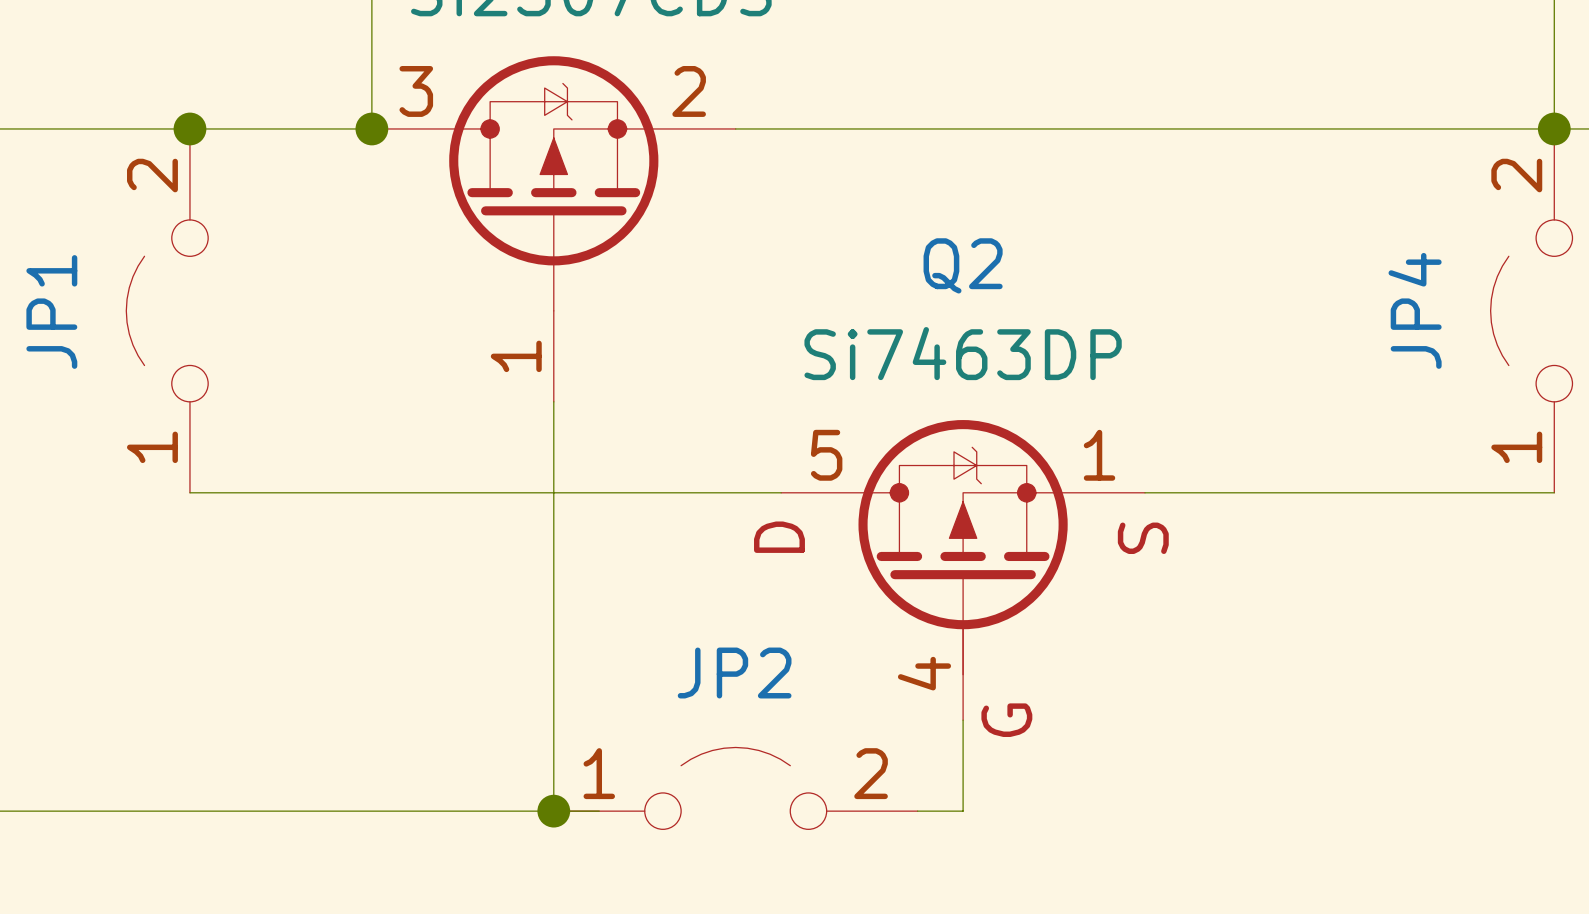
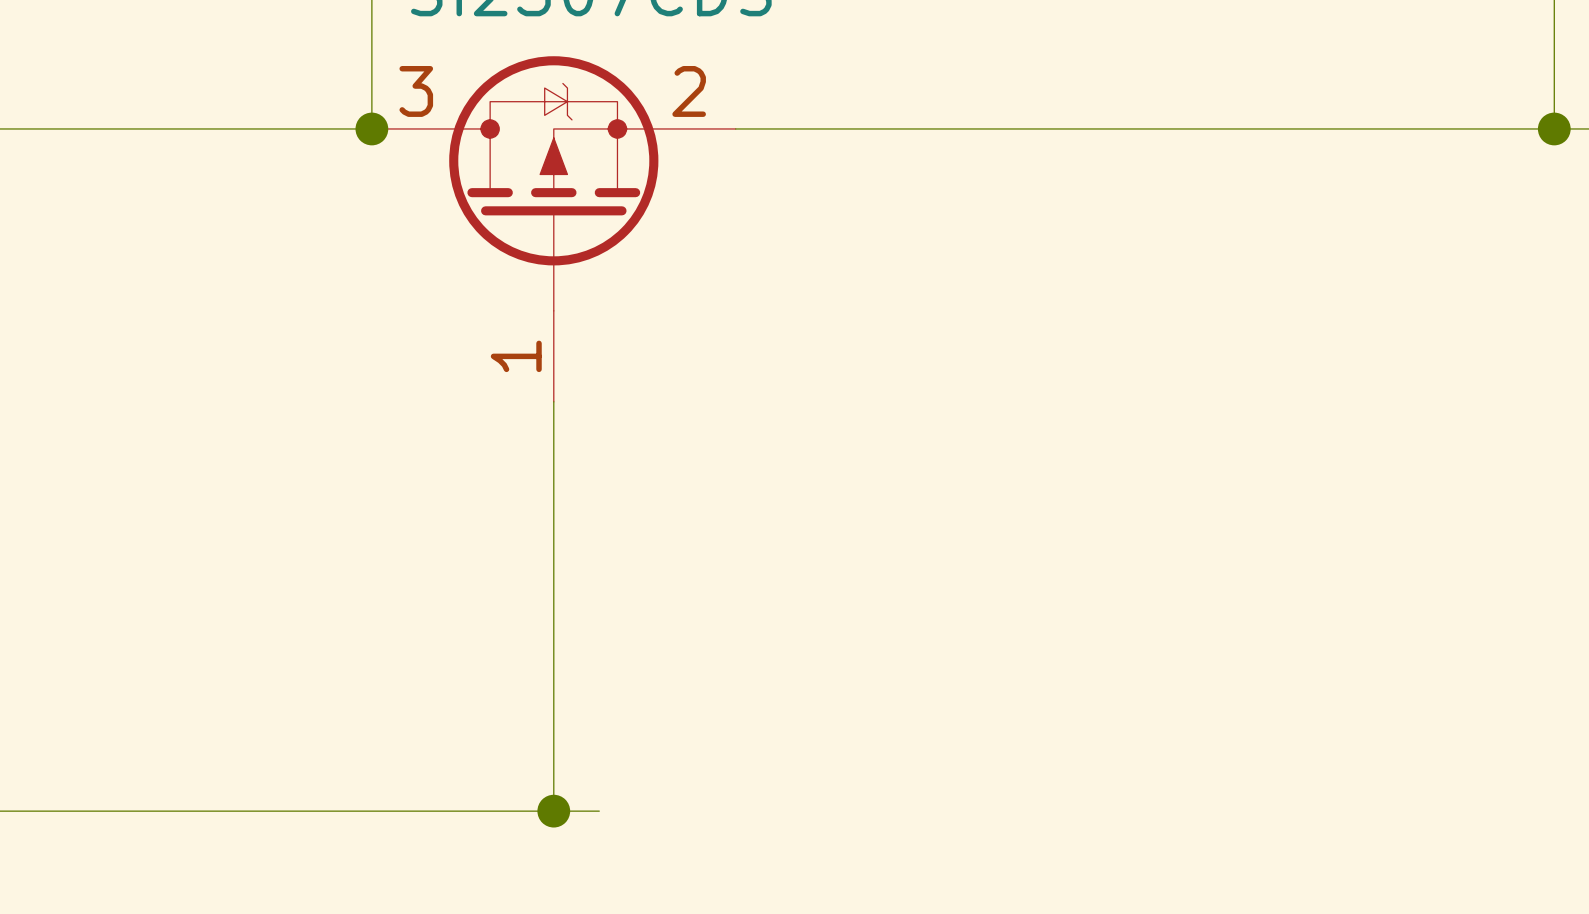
junction: (189, 128) -> none
JP1: (167, 310) -> none
JP4: (1531, 310) -> none
wire: (189, 492) (781, 492) -> none
wire: (1144, 492) (1554, 492) -> none
Q2: Si7463DP (963, 570) -> none
wire: (963, 720) (963, 811) (917, 811) -> none
JP2: (735, 788) -> none

